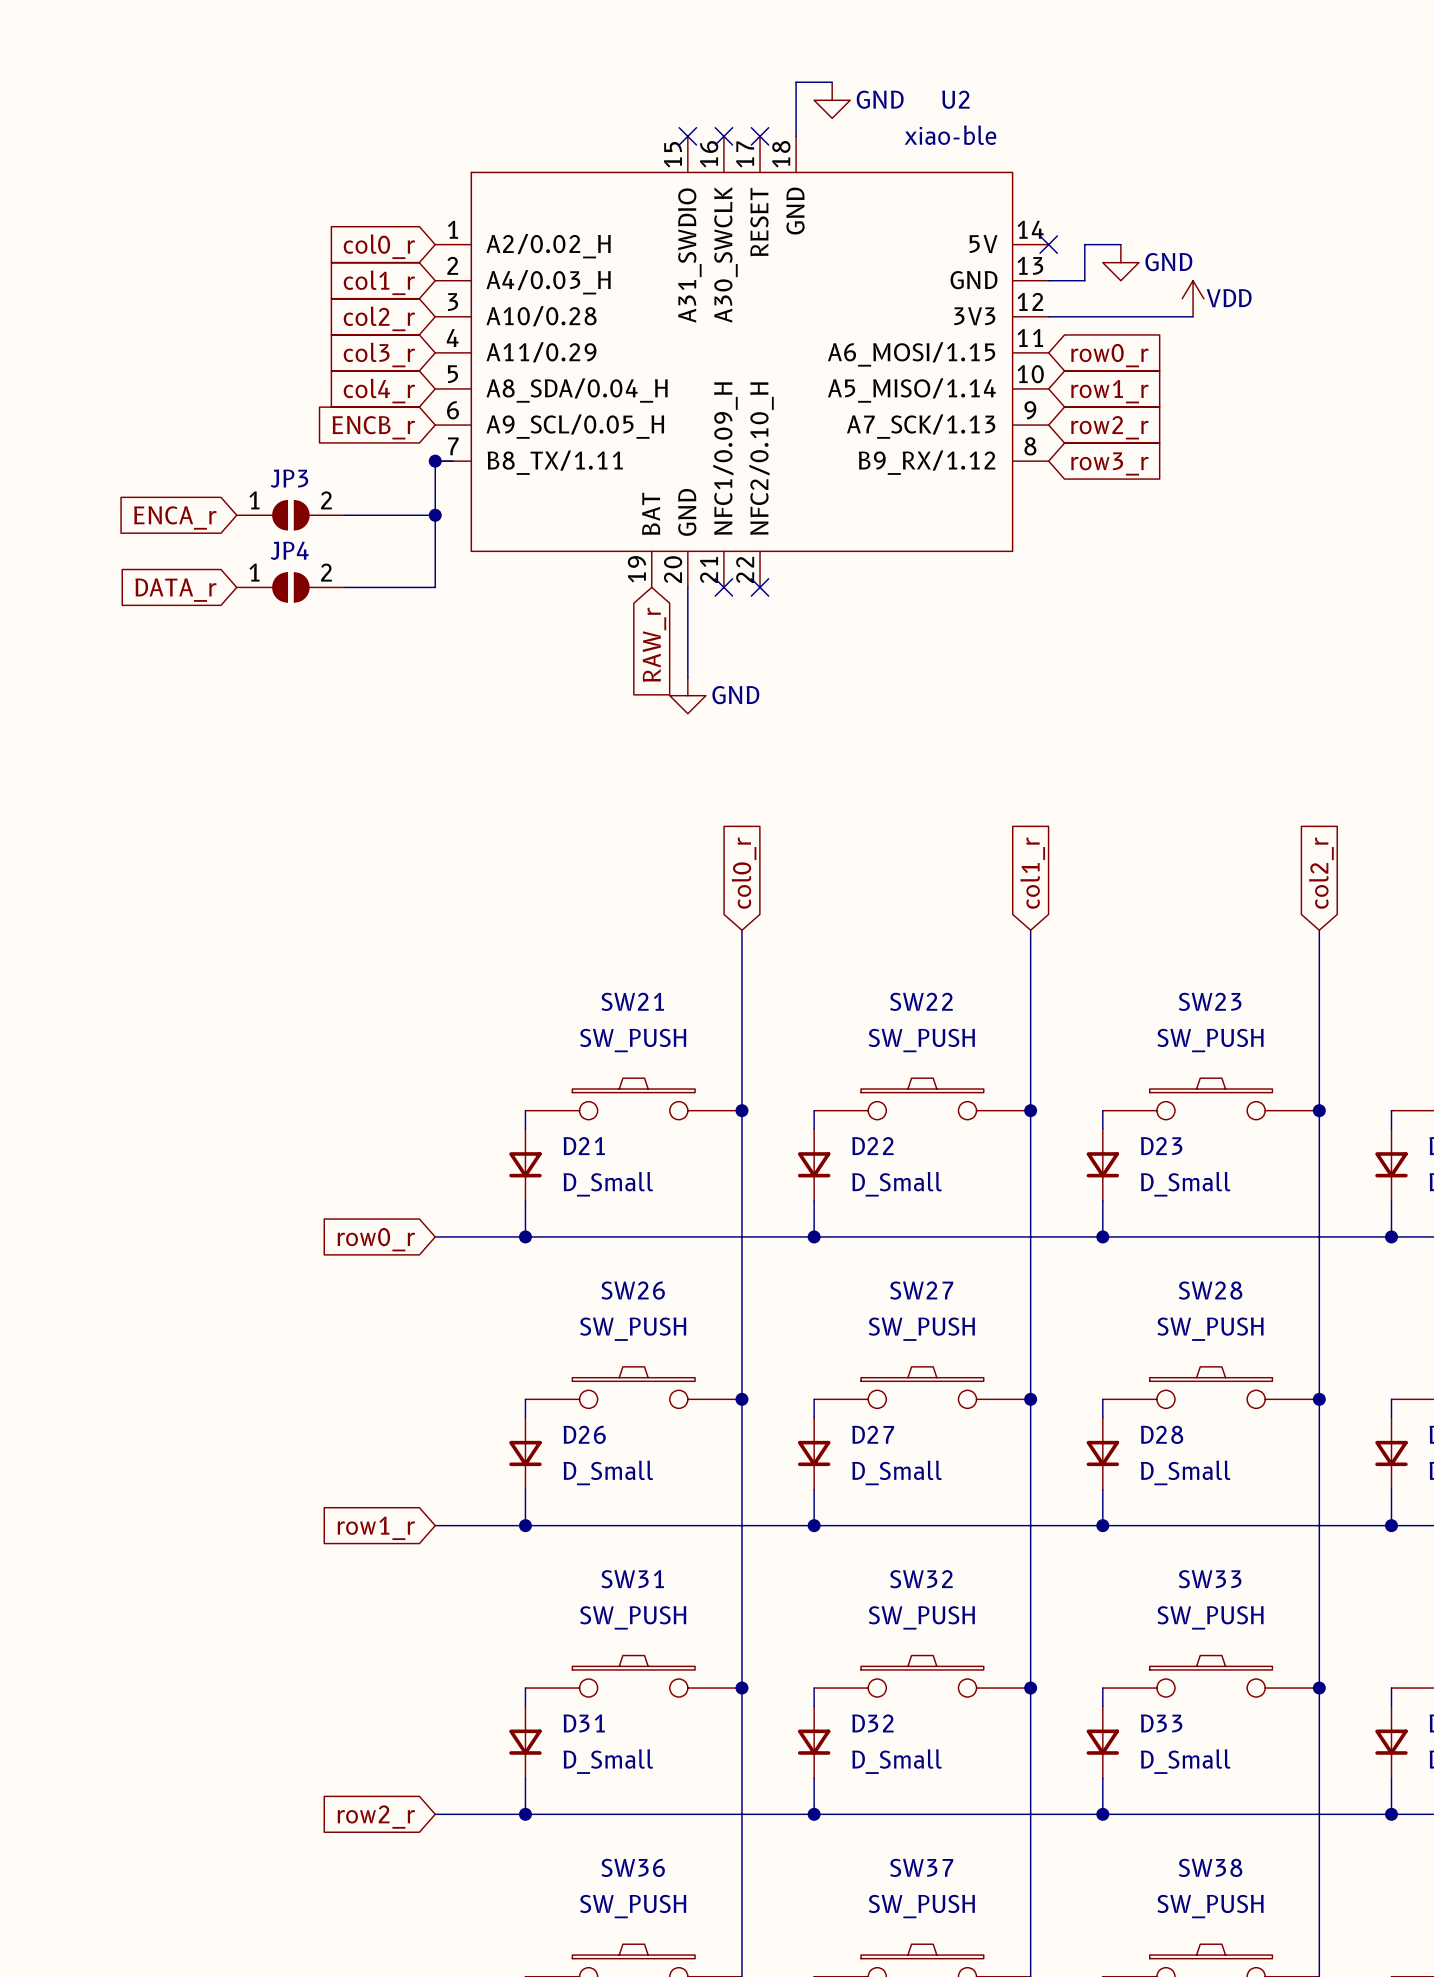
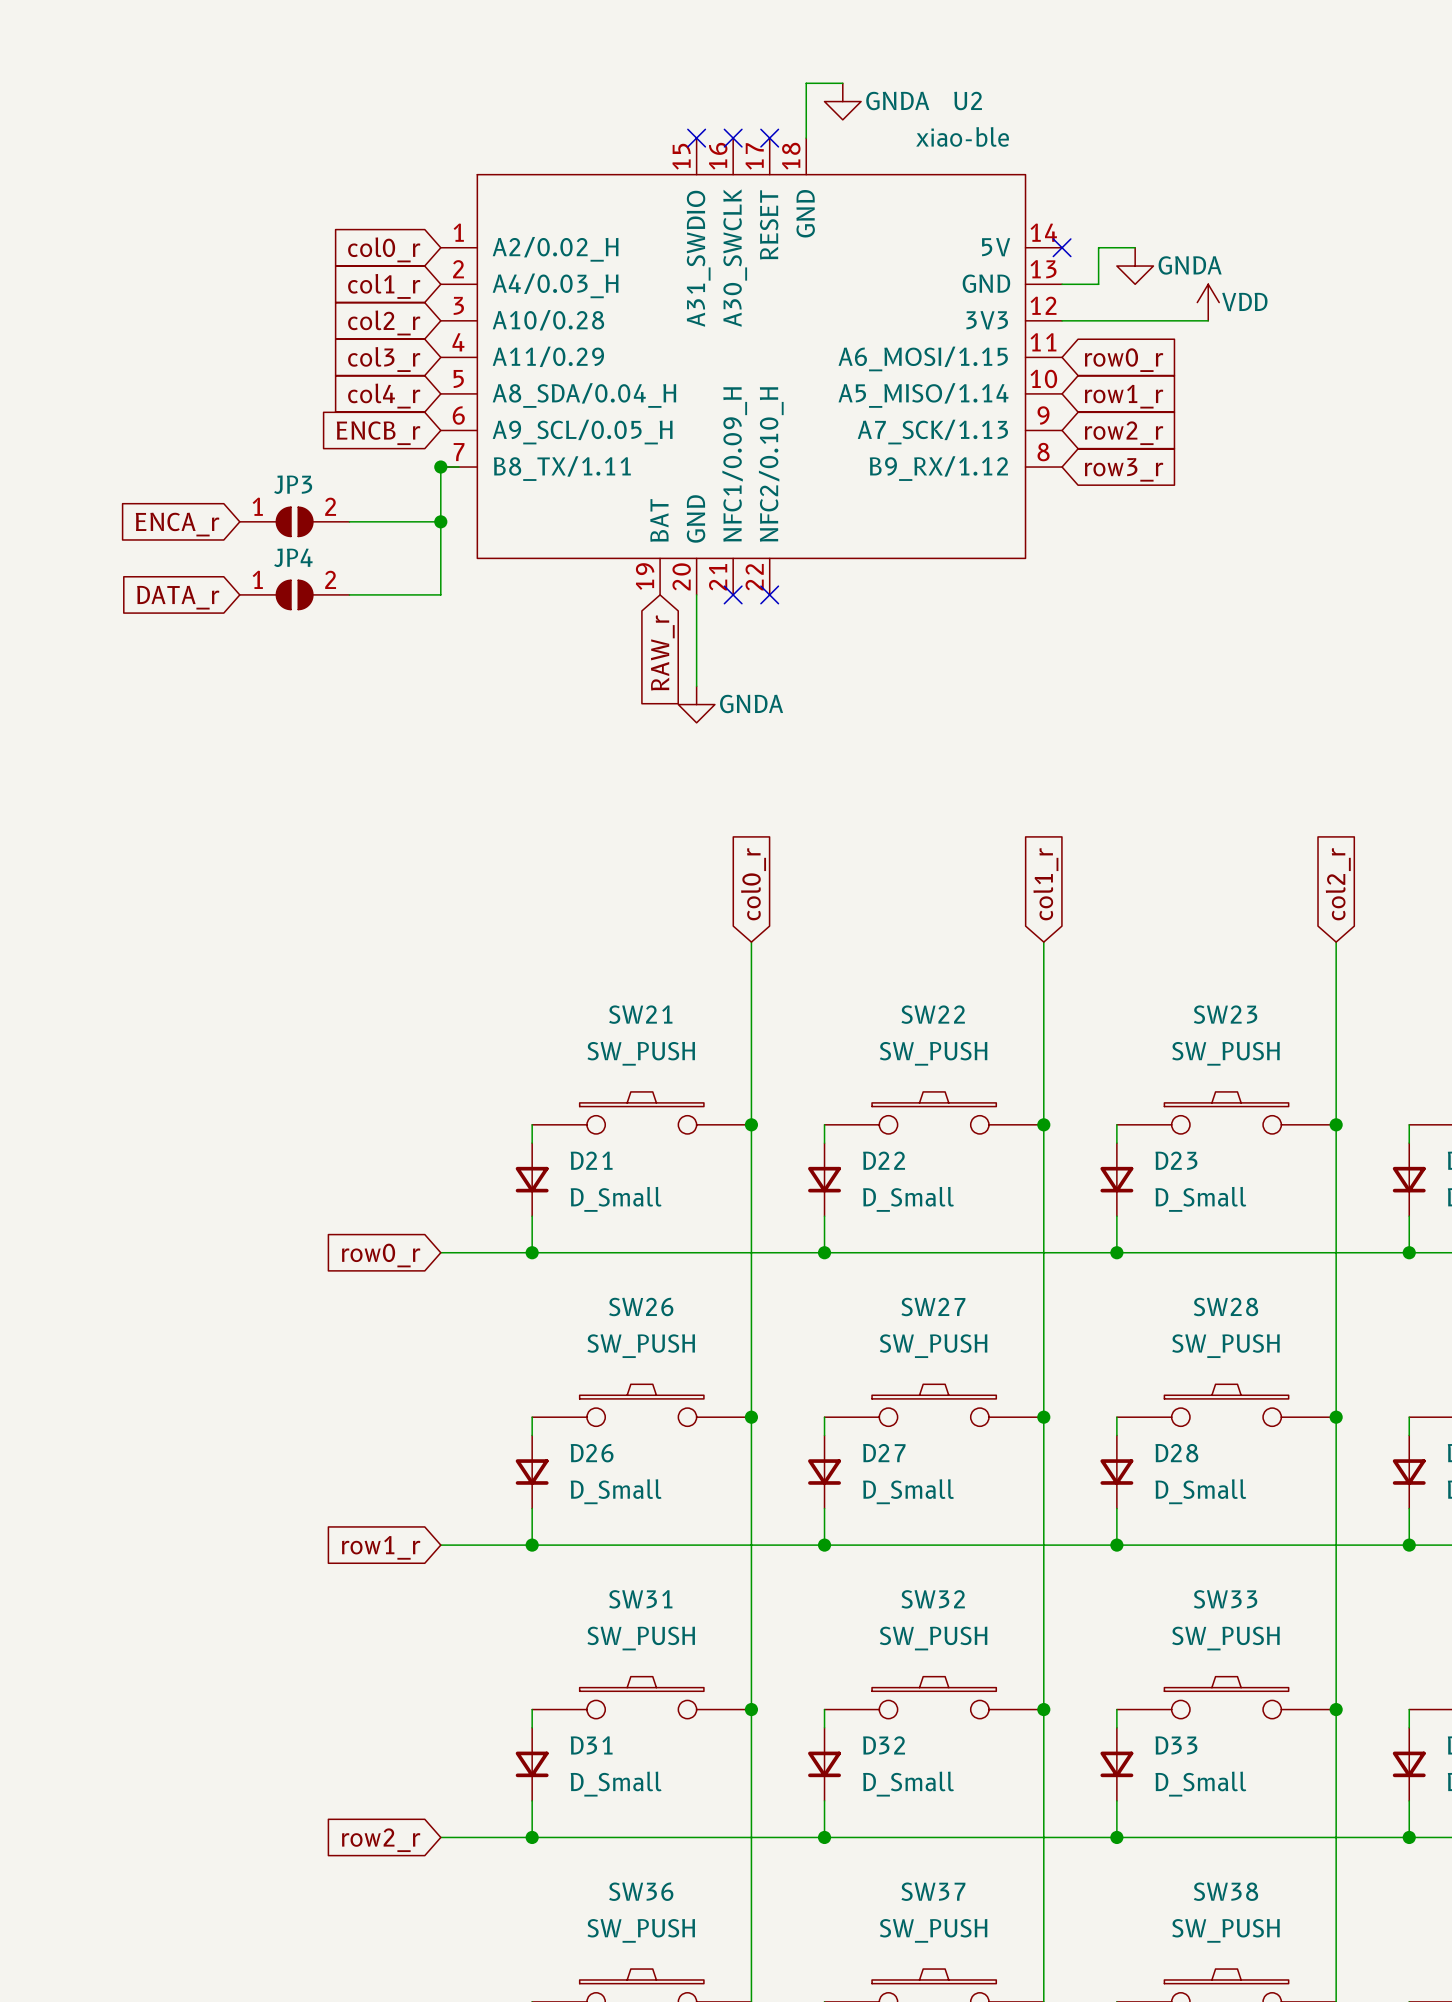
power symbol: GND (832, 100) -> GNDA (842, 101)
power symbol: GND (1120, 262) -> GNDA (1135, 266)
power symbol: GND (687, 695) -> GNDA (696, 704)

